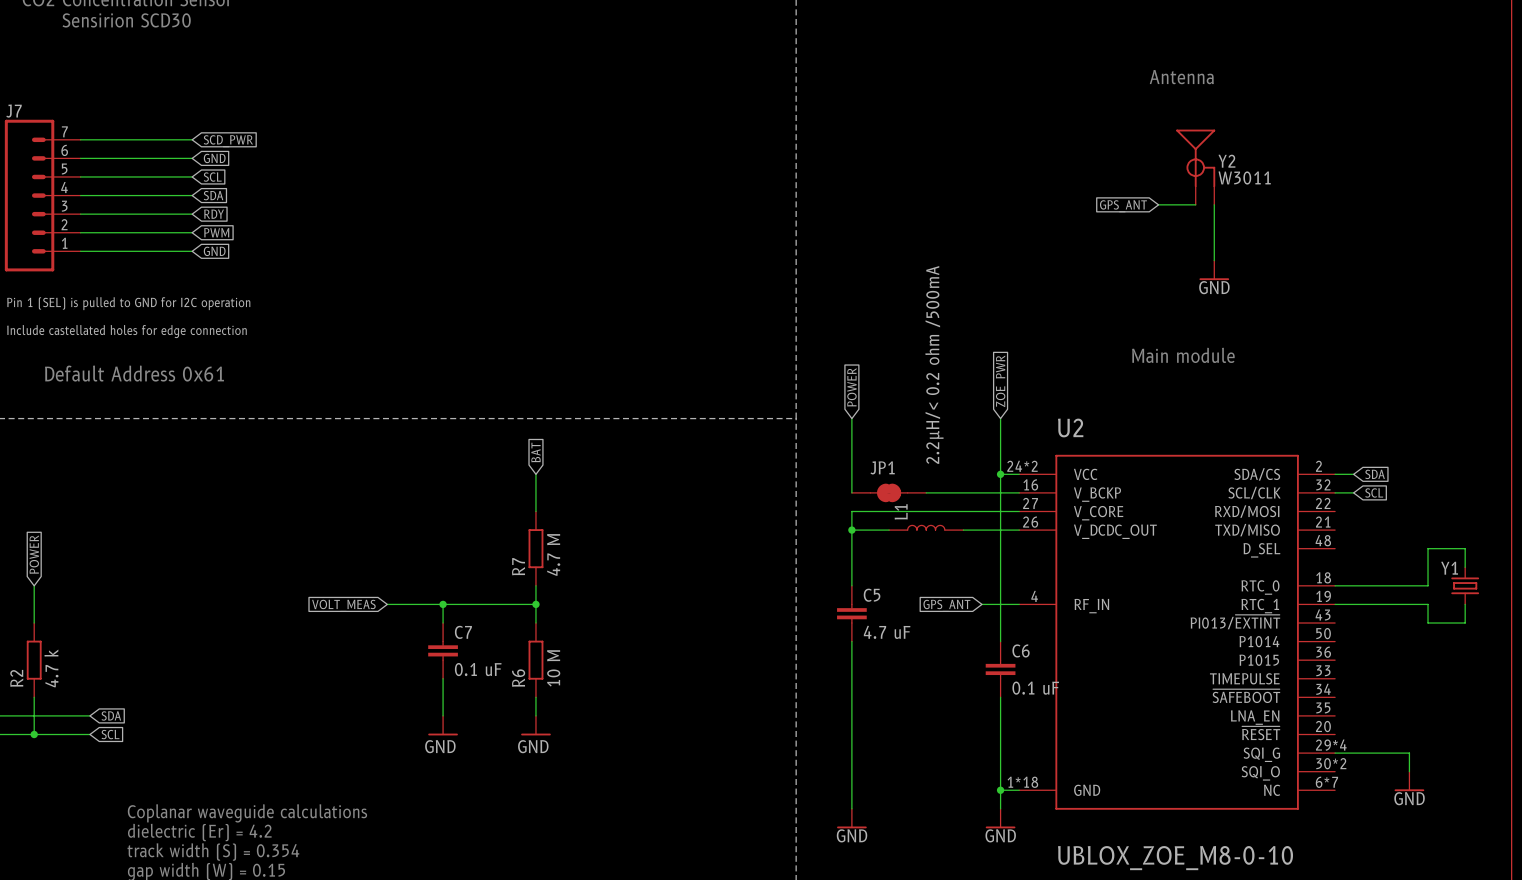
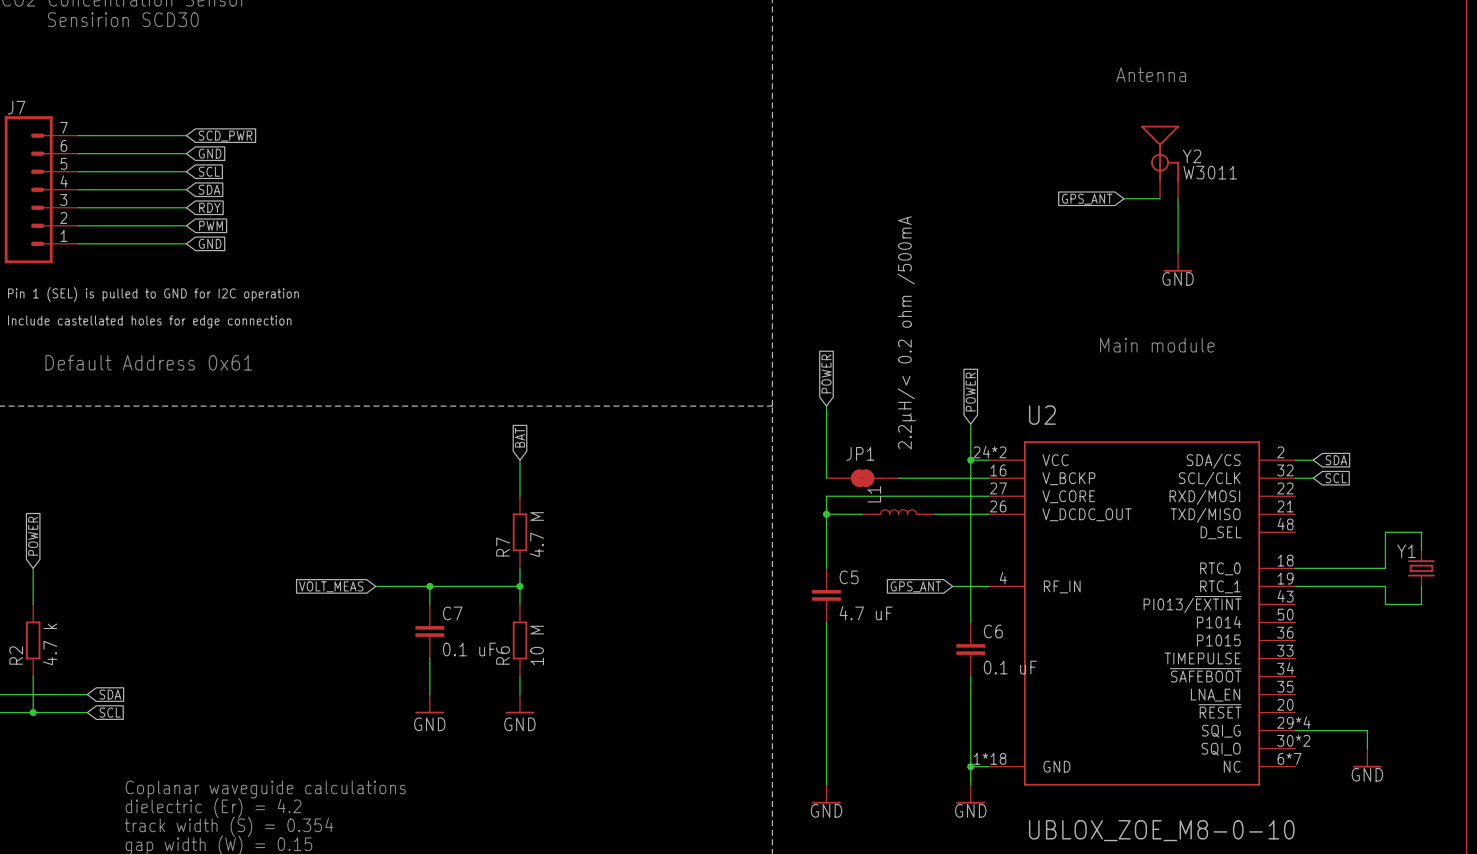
global label: ZOE_PWR (1001, 381) -> none
global label: none -> POWER (970, 391)
wire: (1000, 418) (1000, 437) -> none

